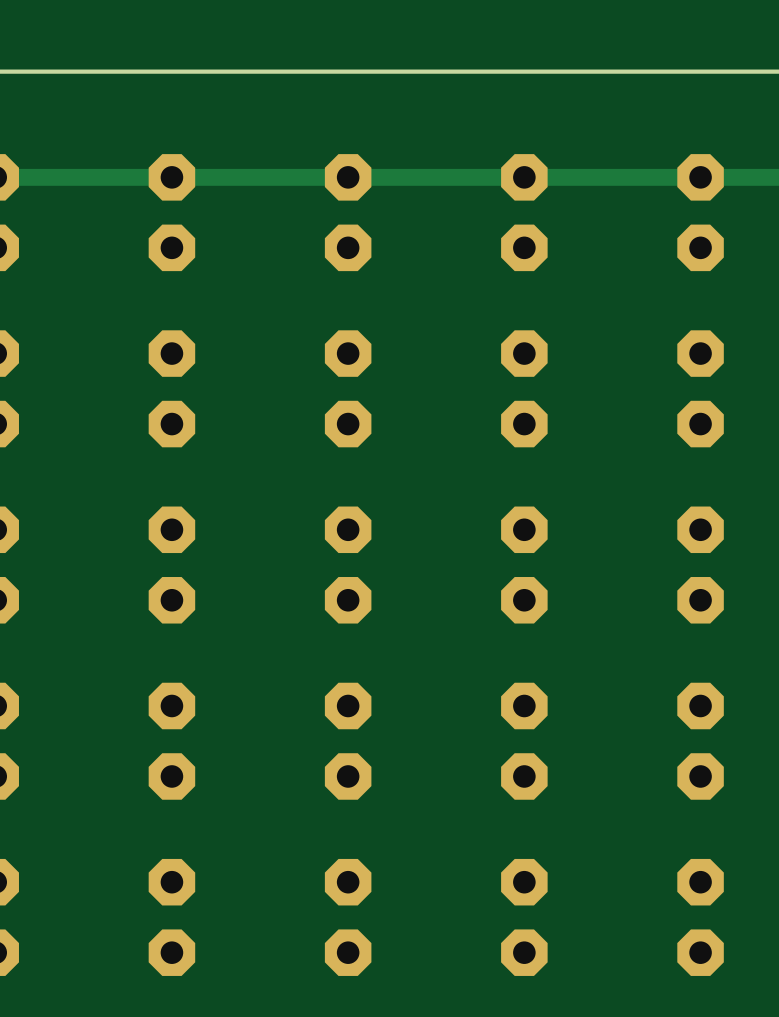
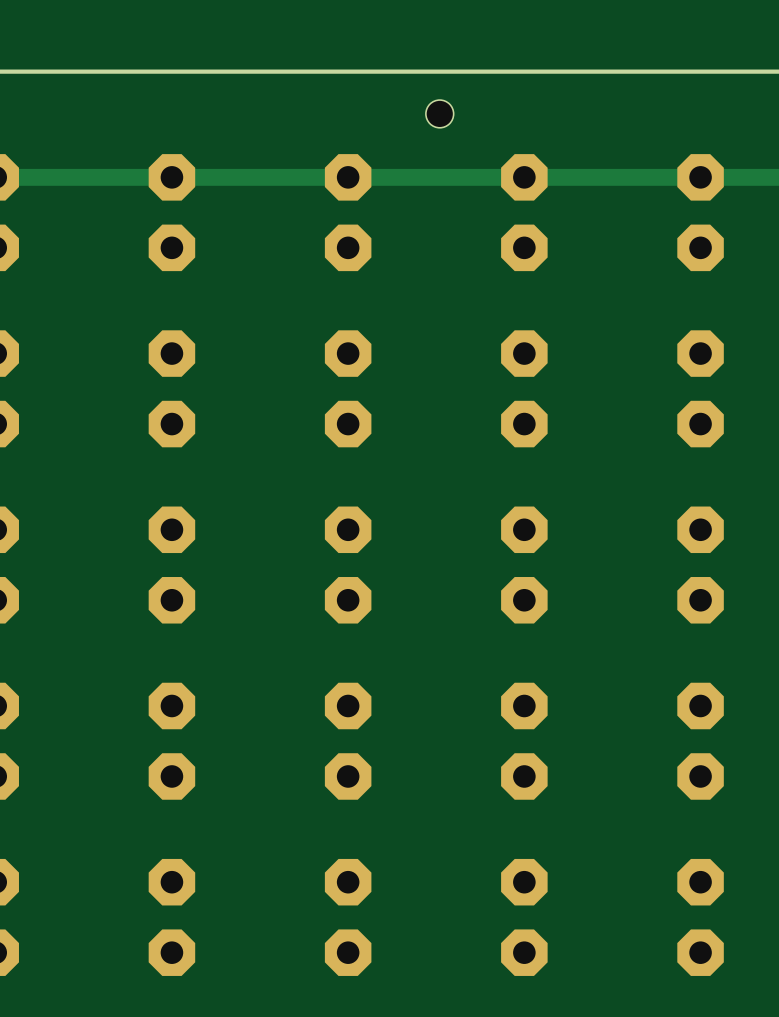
hole: none -> (439, 113)

